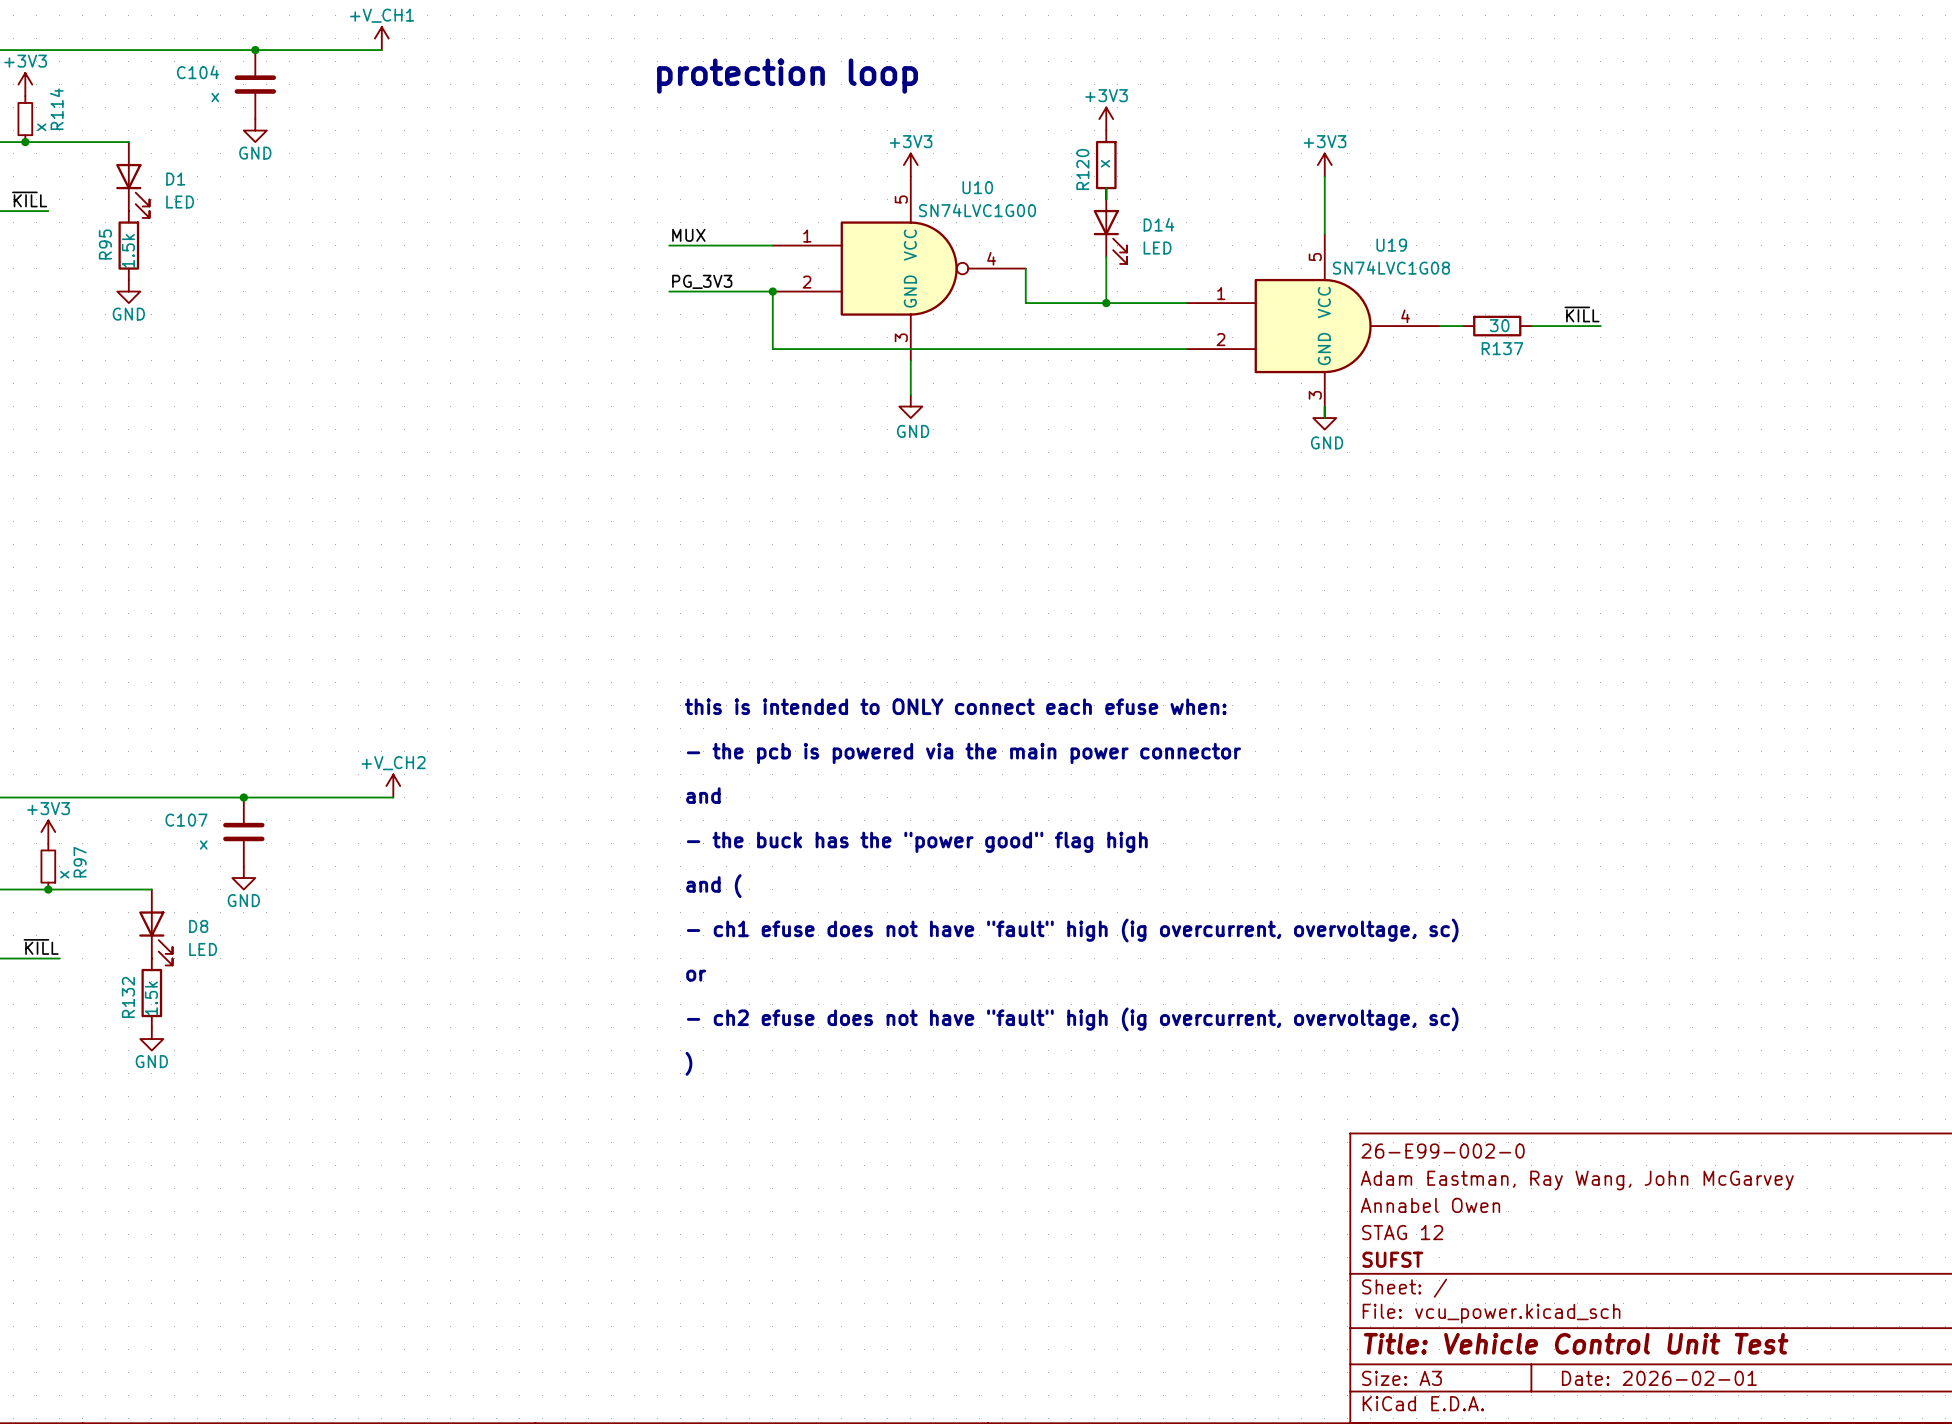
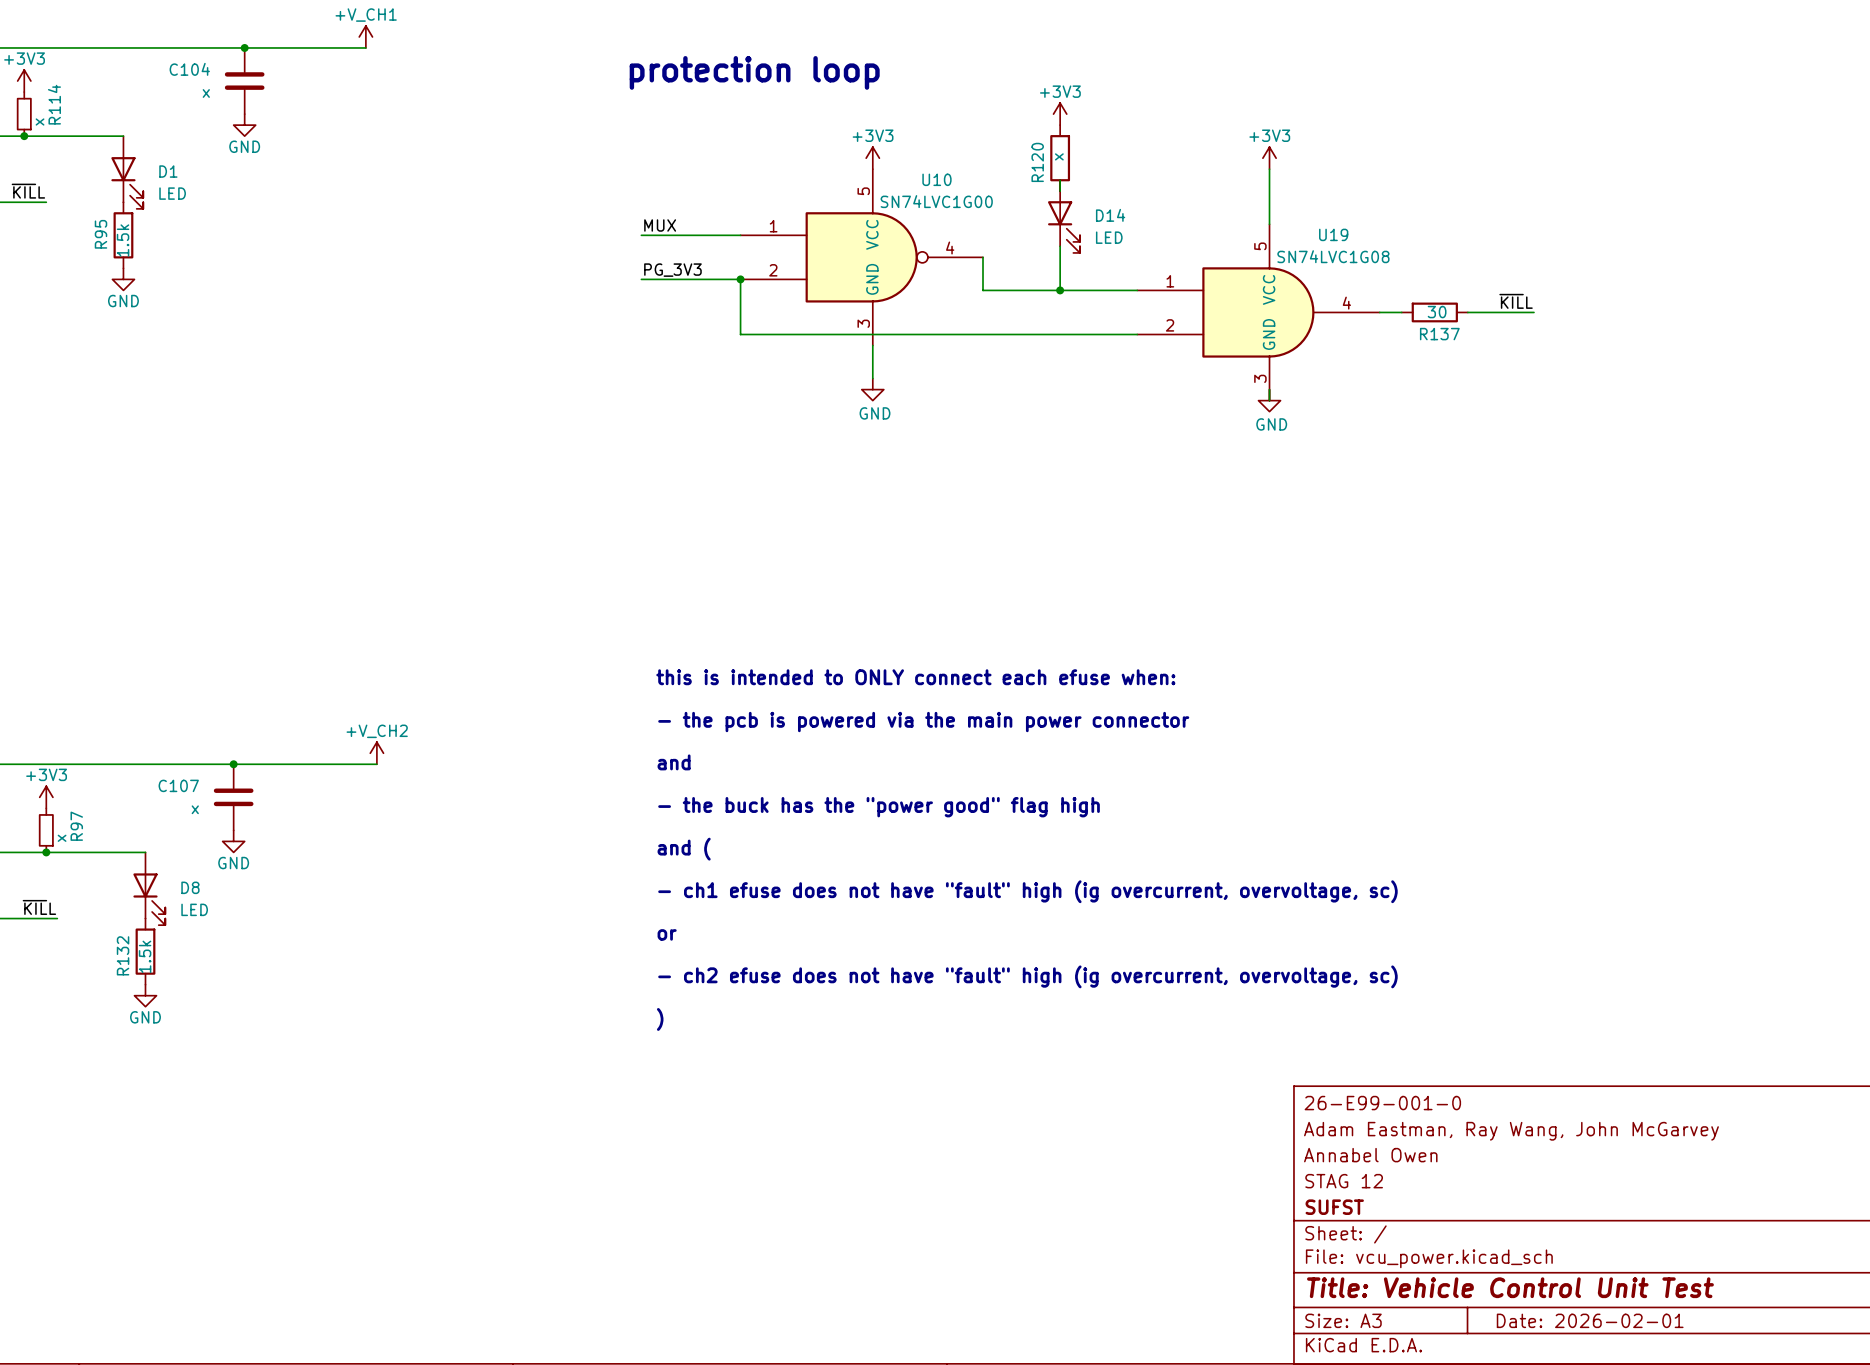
title block: 26-E99-002-0 (1443, 1151) -> 26-E99-001-0 (1382, 1103)

